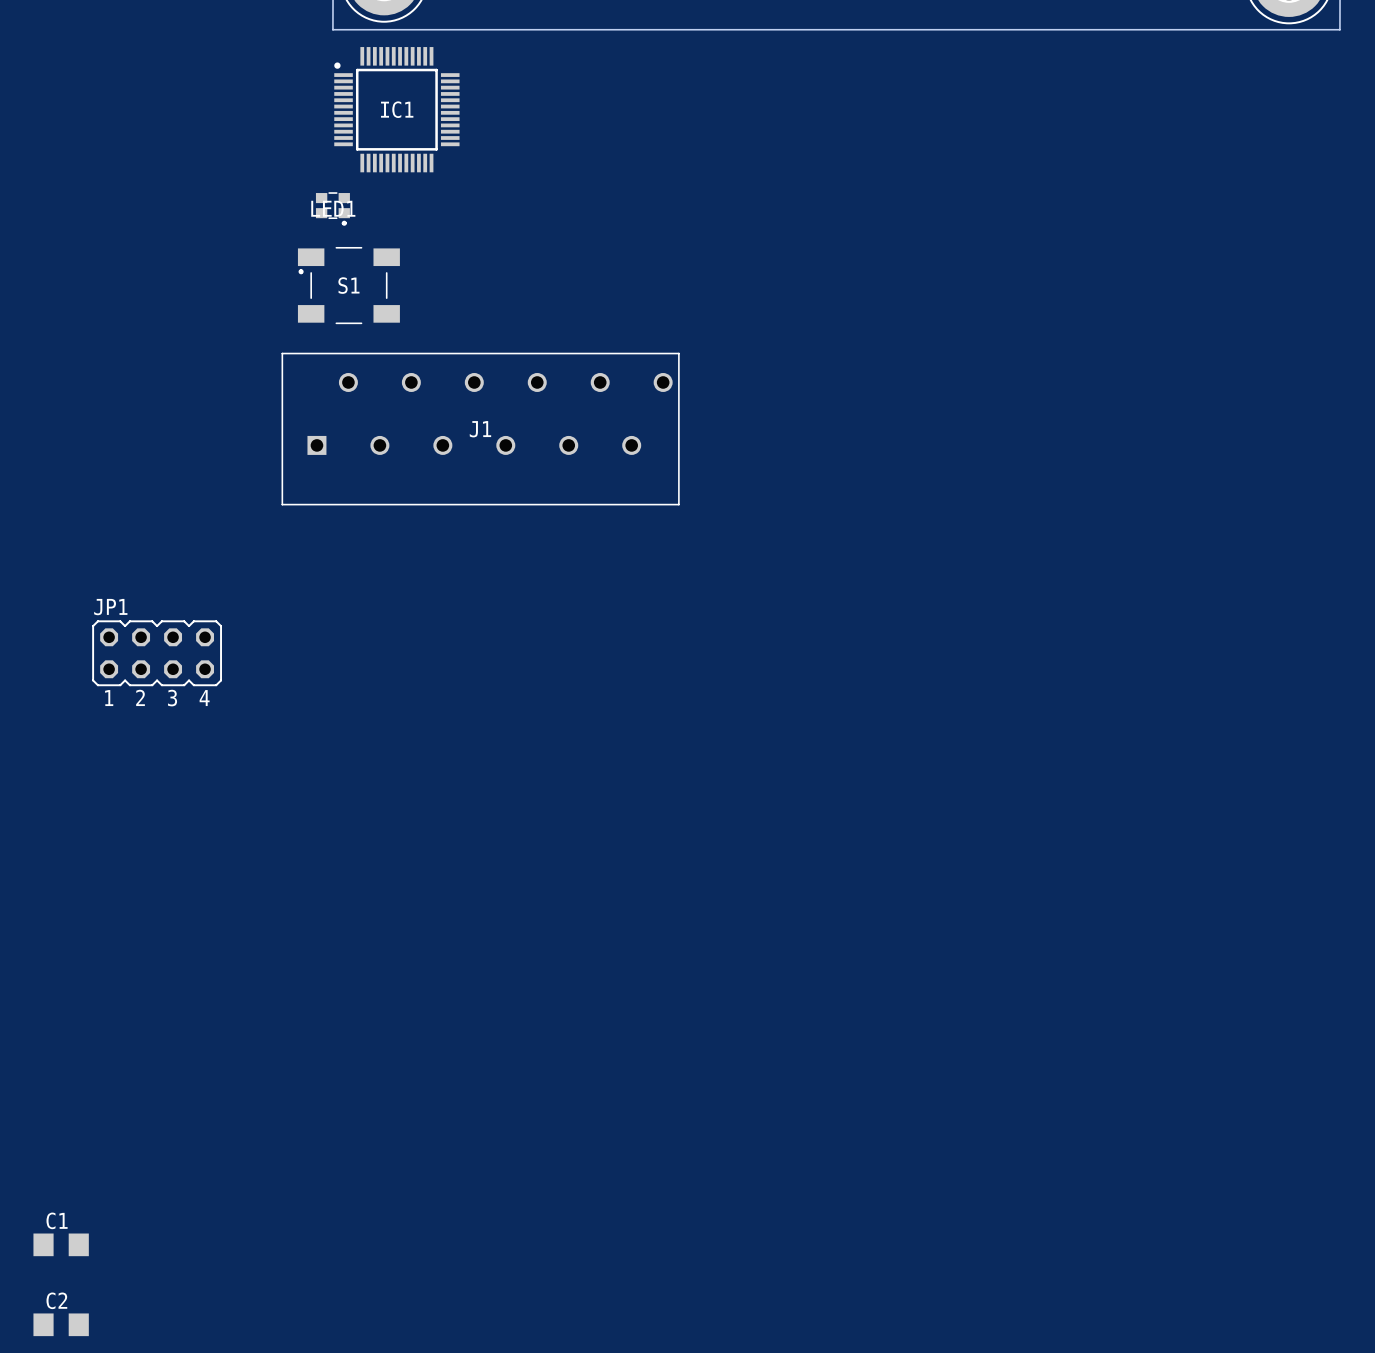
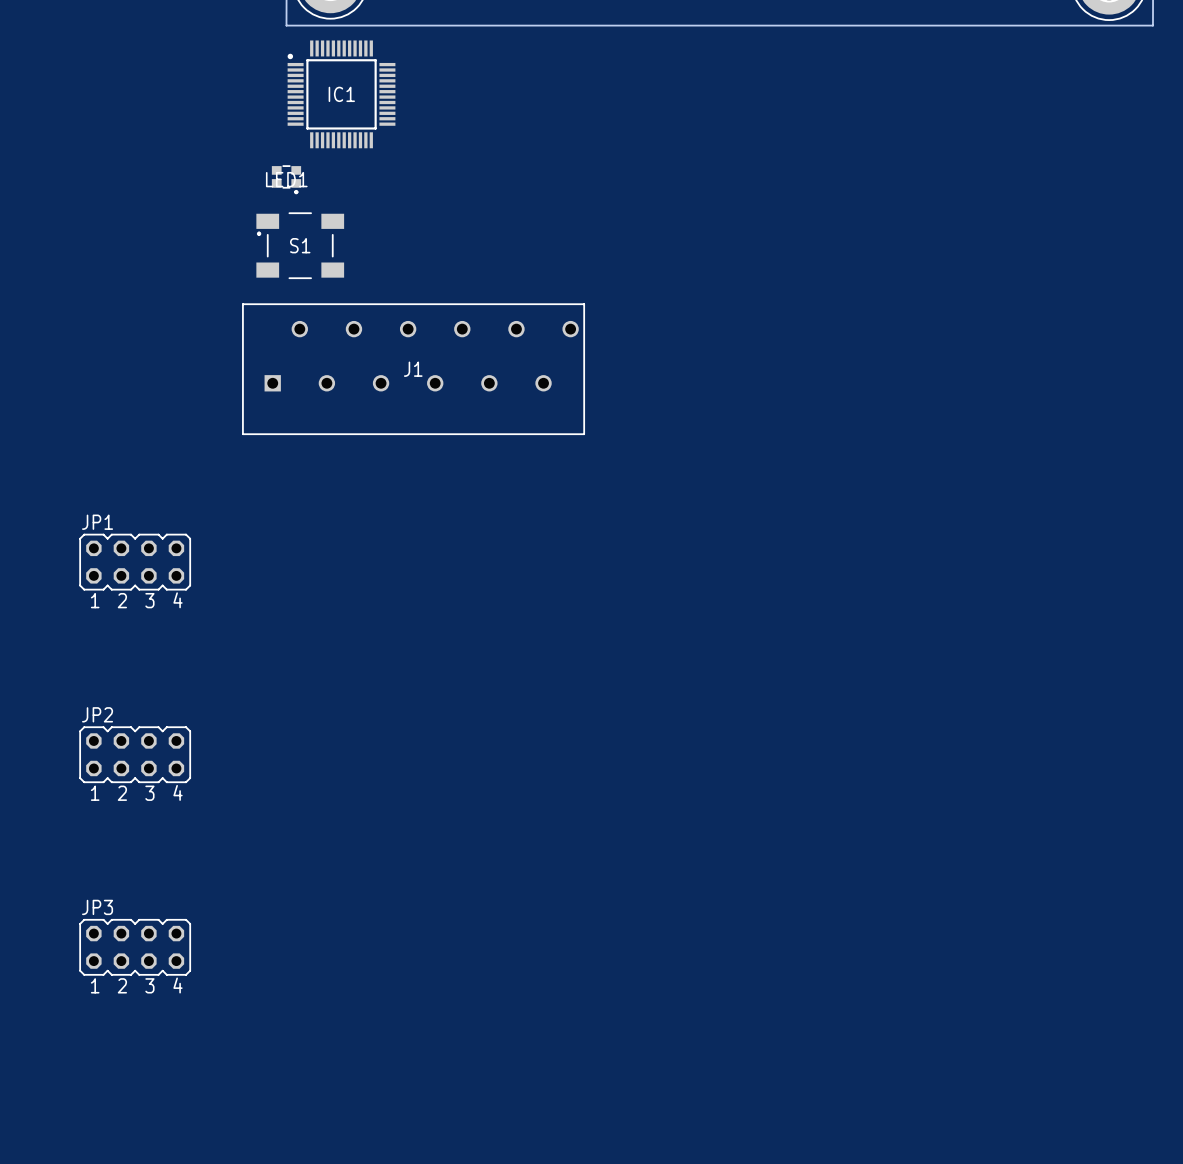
JP2: none -> (135, 754)
JP3: none -> (135, 947)
C1: (61, 1244) -> none
C2: (61, 1324) -> none

